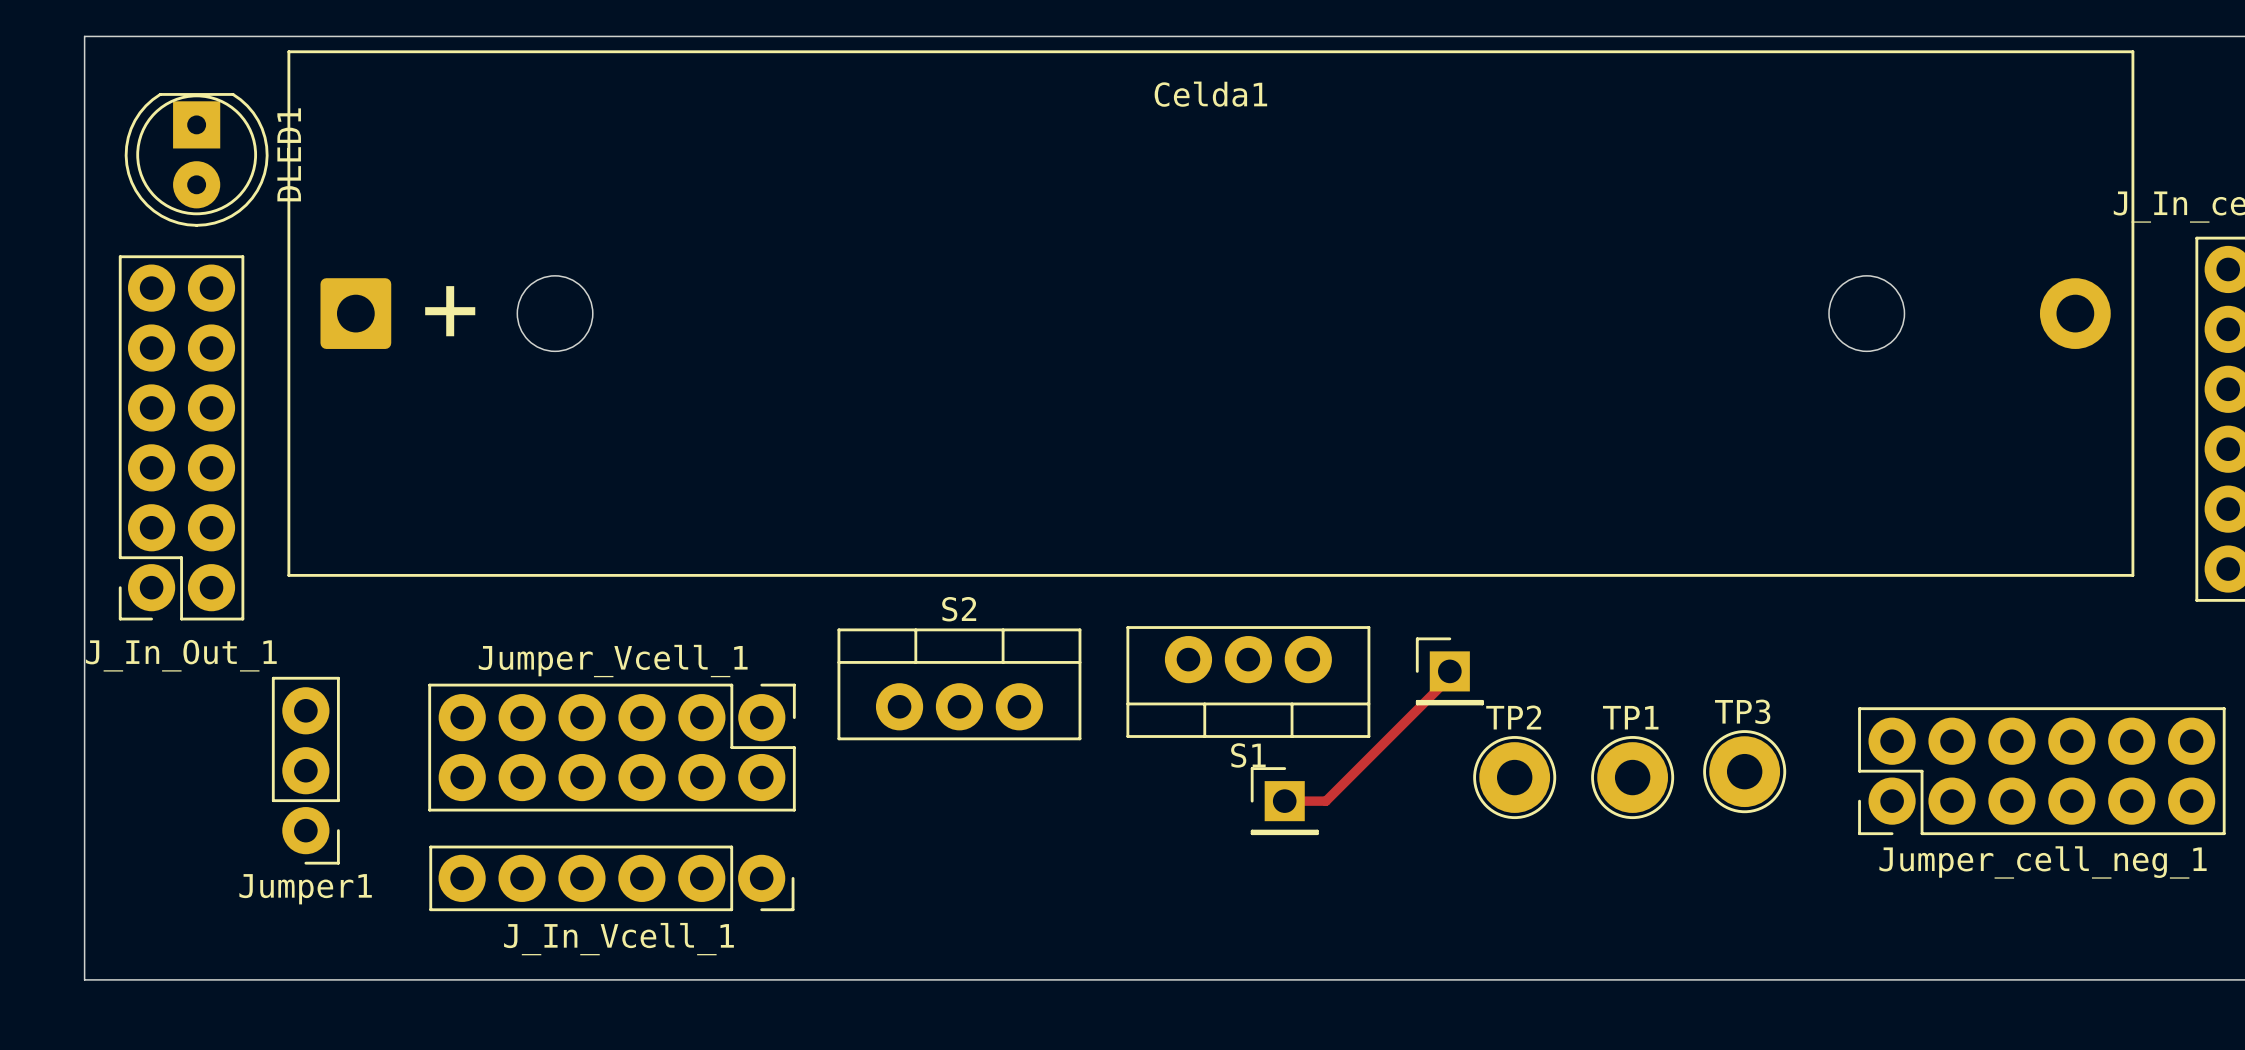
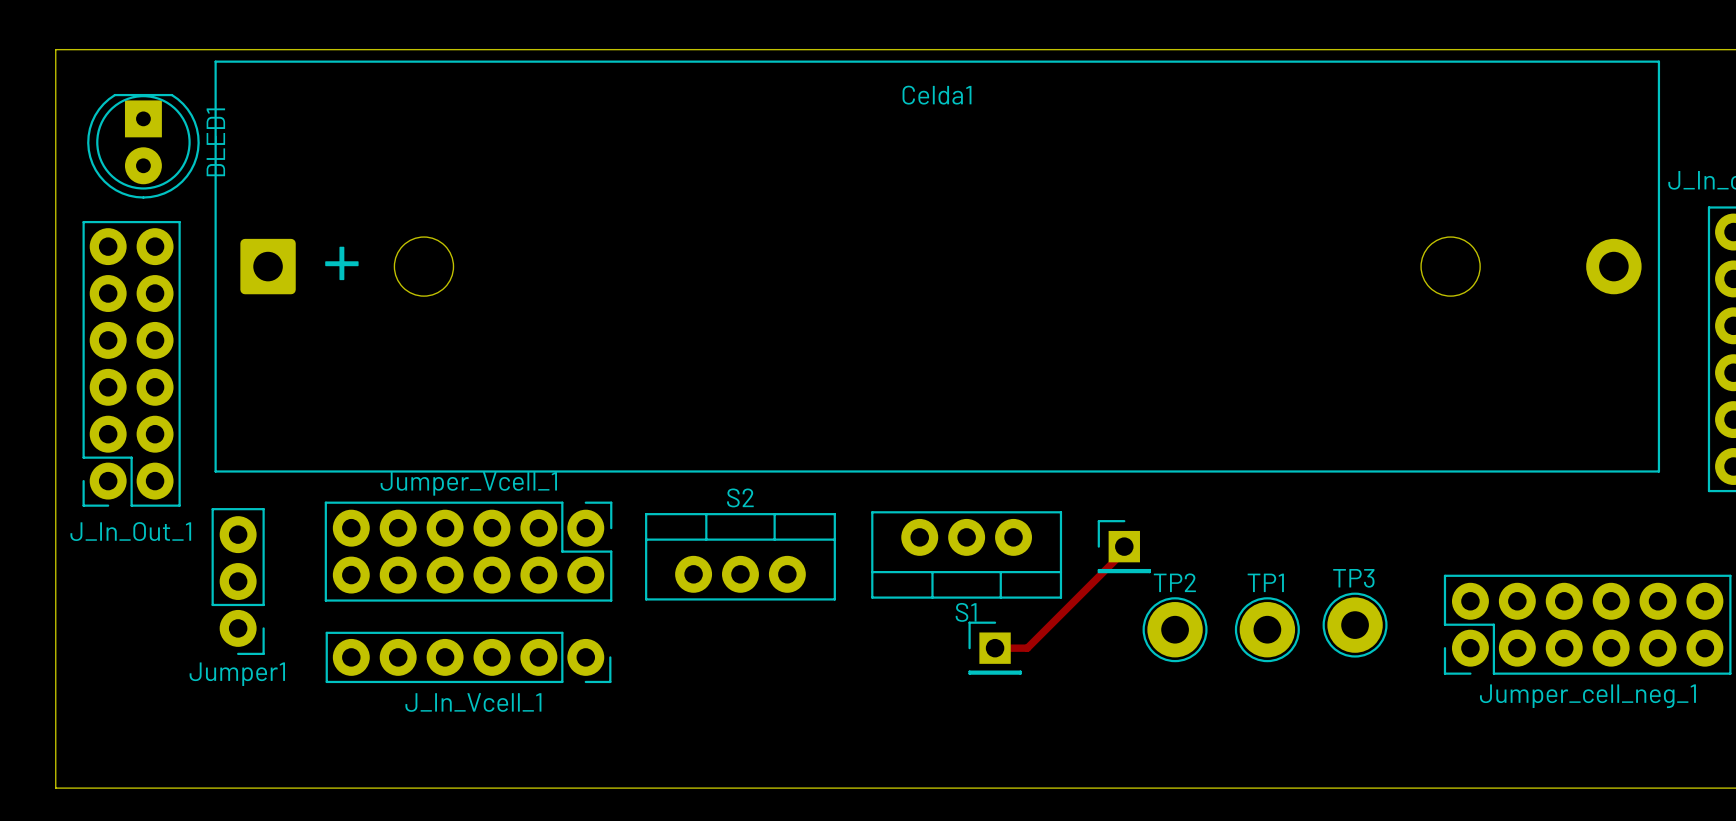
Jumper_Vcell_1 position: (612, 747) -> (468, 551)
Jumper1 position: (305, 770) -> (238, 581)
J_In_Vcell_1 position: (611, 878) -> (468, 657)

